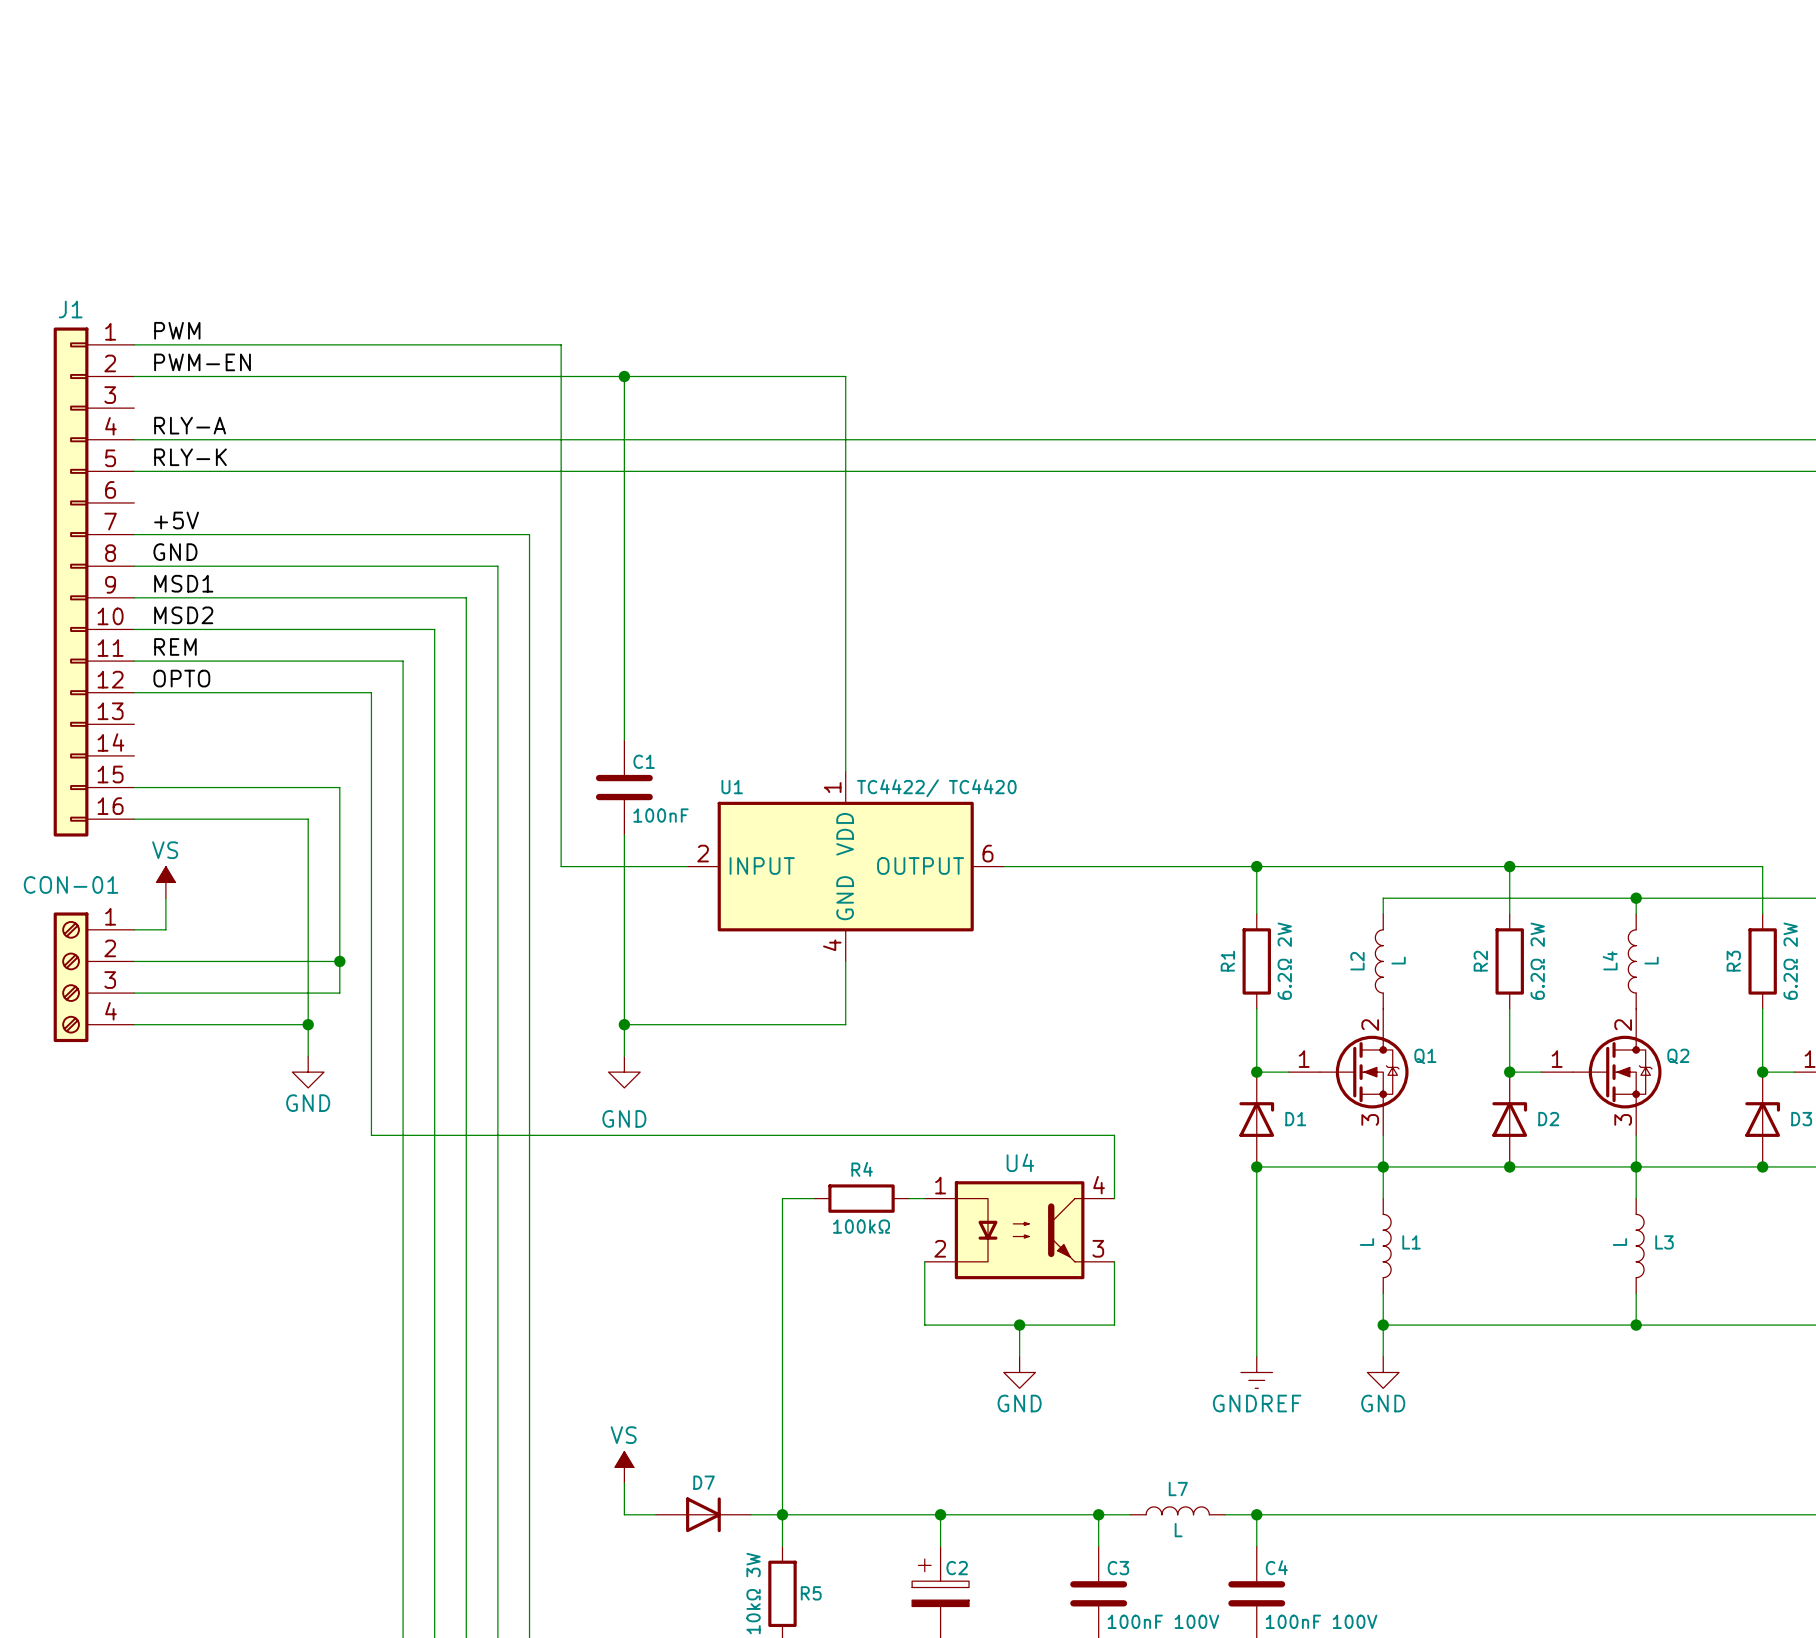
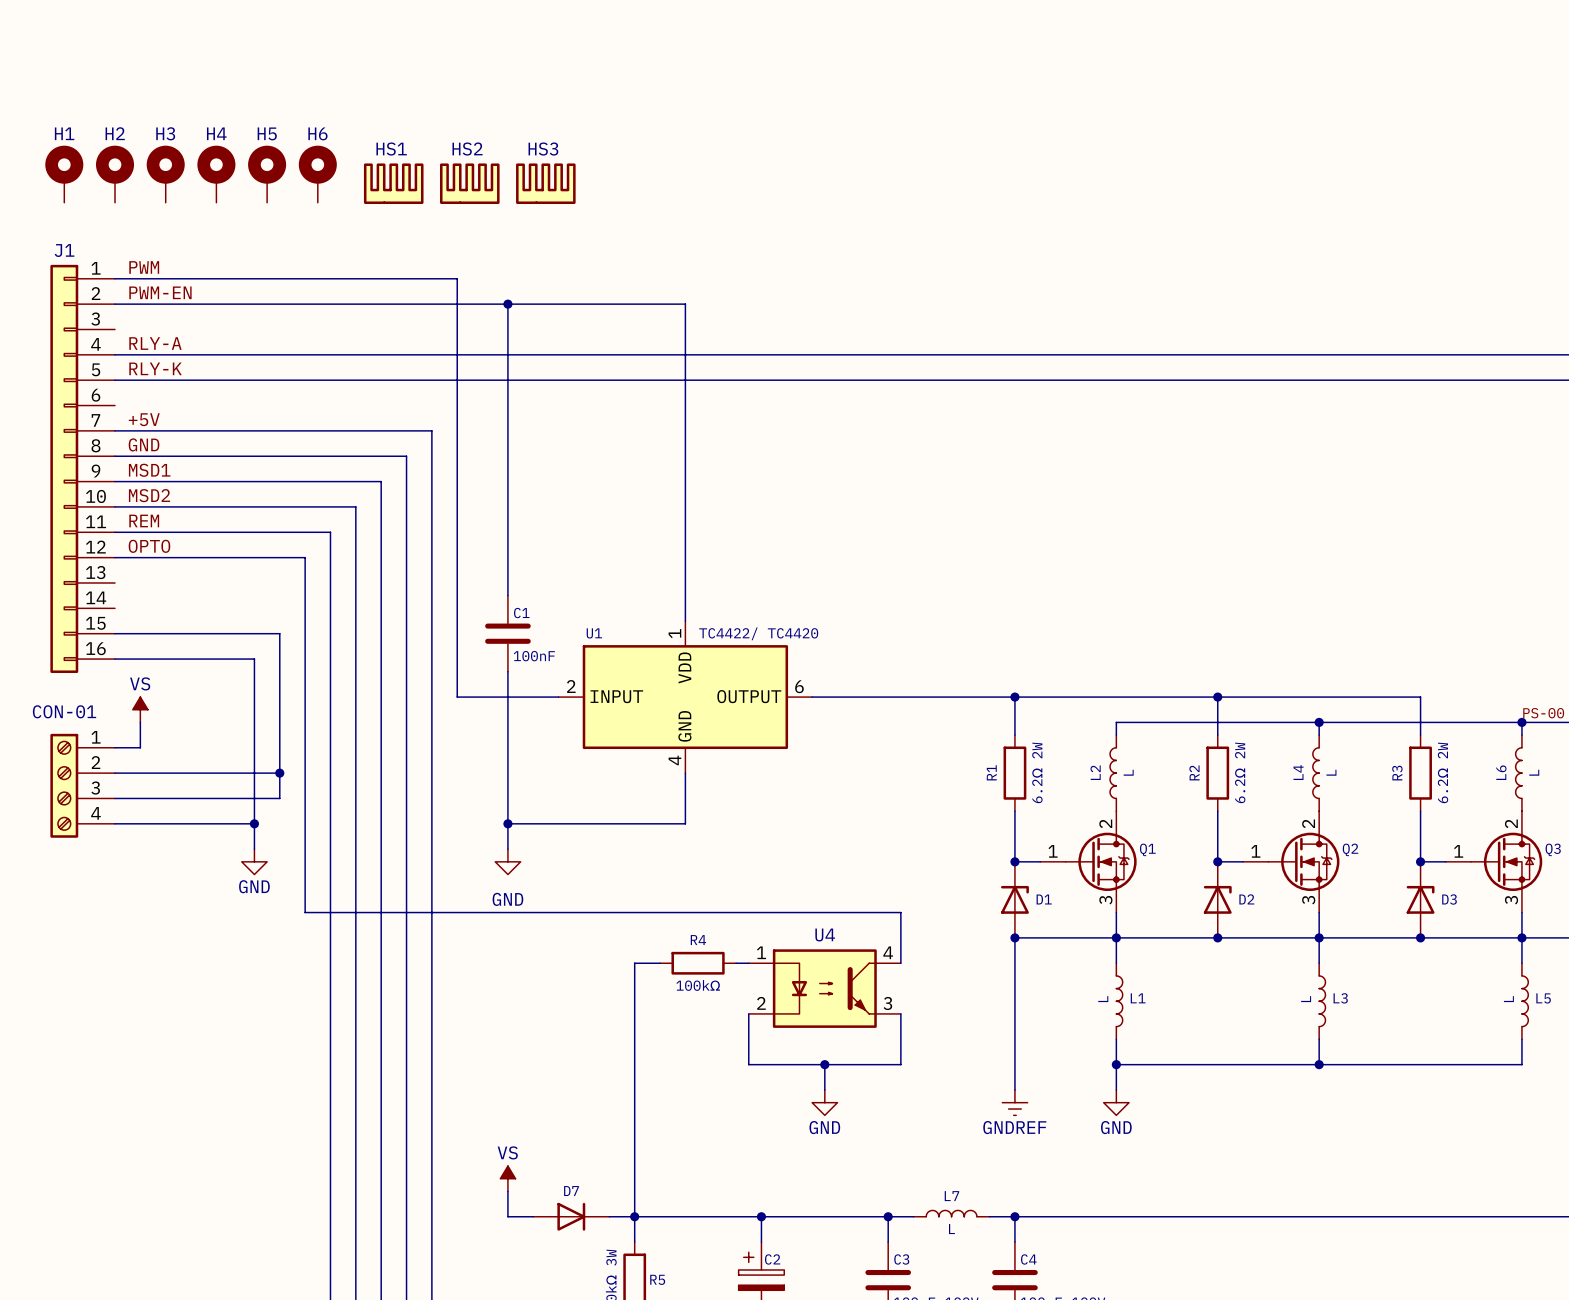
H1: none -> (64, 174)
H2: none -> (115, 174)
H3: none -> (165, 174)
H4: none -> (216, 174)
H5: none -> (267, 174)
H6: none -> (317, 174)
HS1: none -> (393, 183)
HS2: none -> (469, 183)
HS3: none -> (545, 183)

